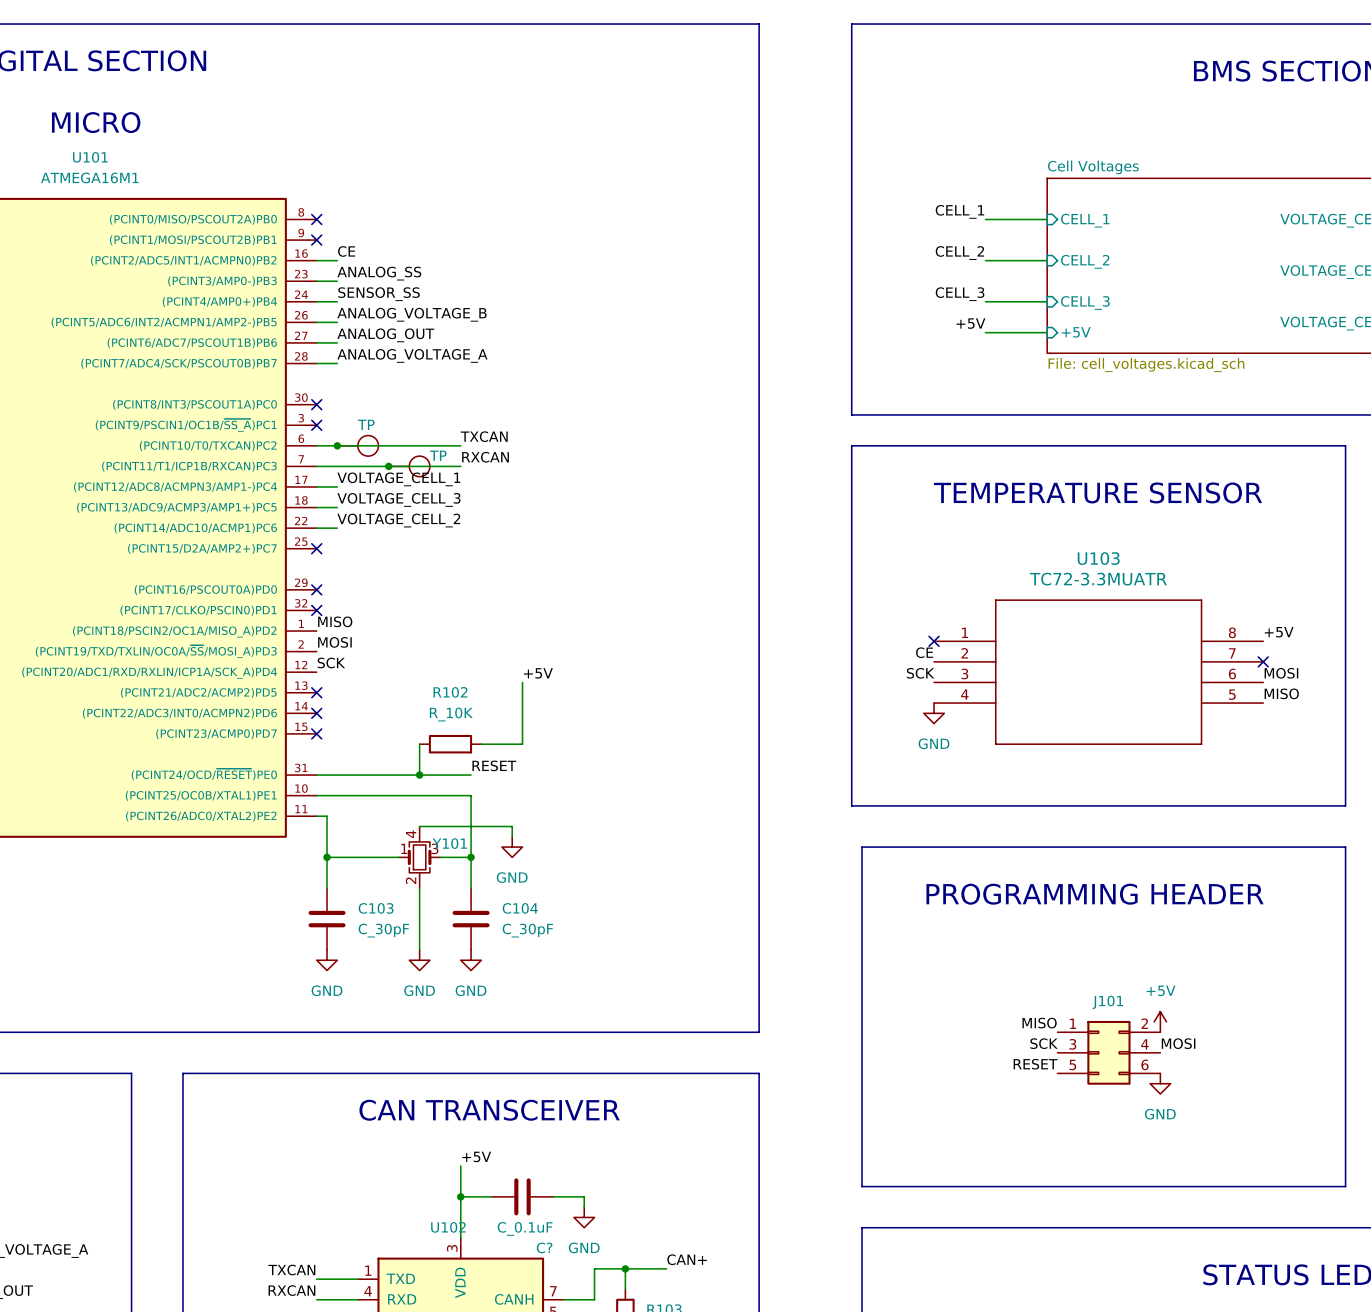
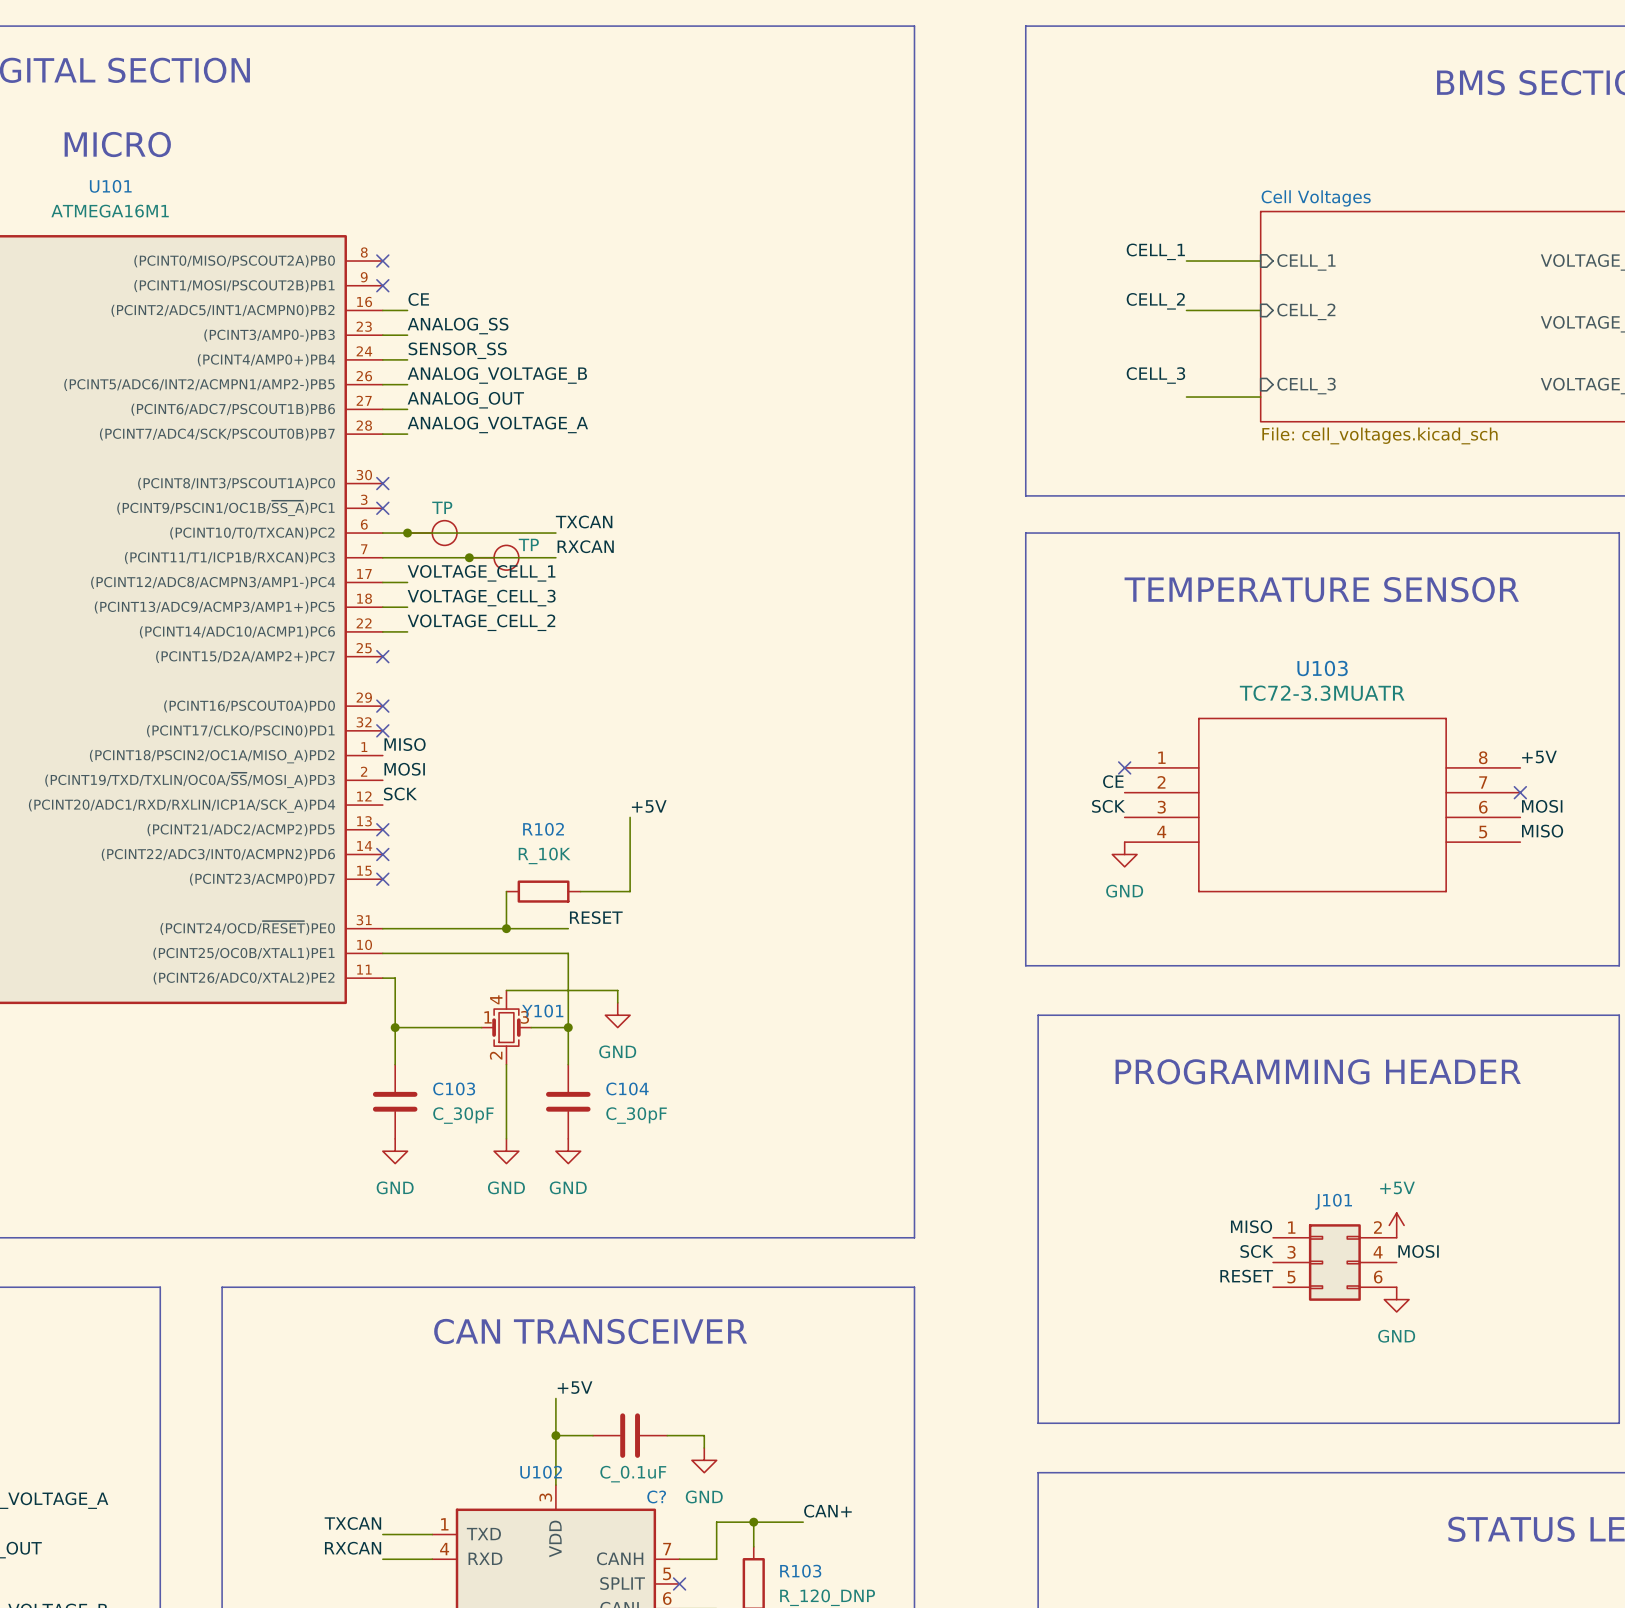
label position: CELL_3 (960, 294) -> CELL_3 (1155, 375)
wire: (985, 301) (1047, 301) -> none
sheet pin position: CELL_3 (1085, 302) -> CELL_3 (1306, 386)
label: +5V (970, 323) -> none
sheet pin: +5V (1076, 332) -> none

